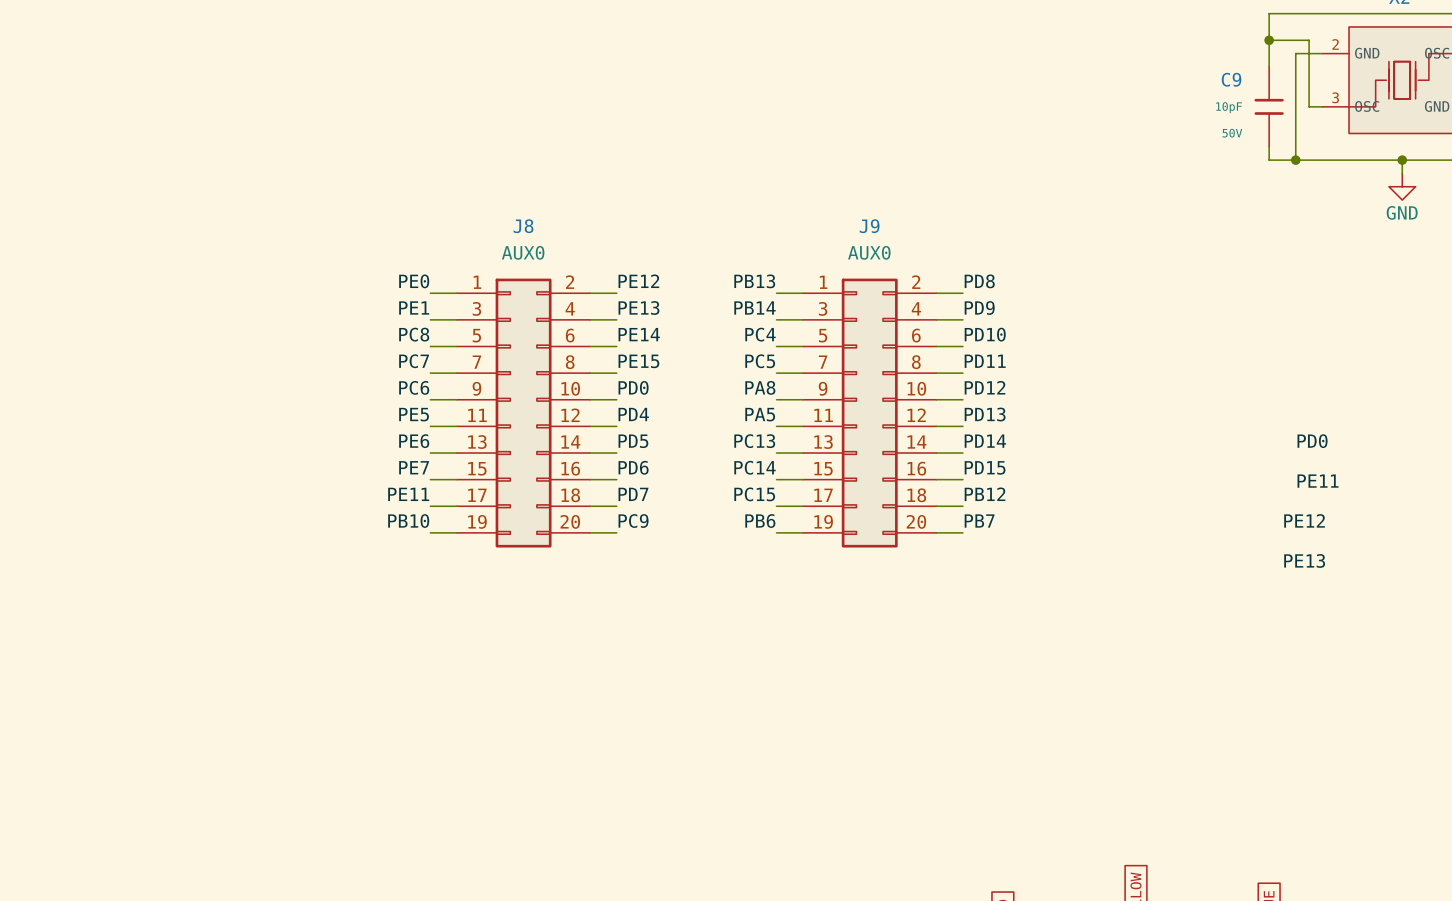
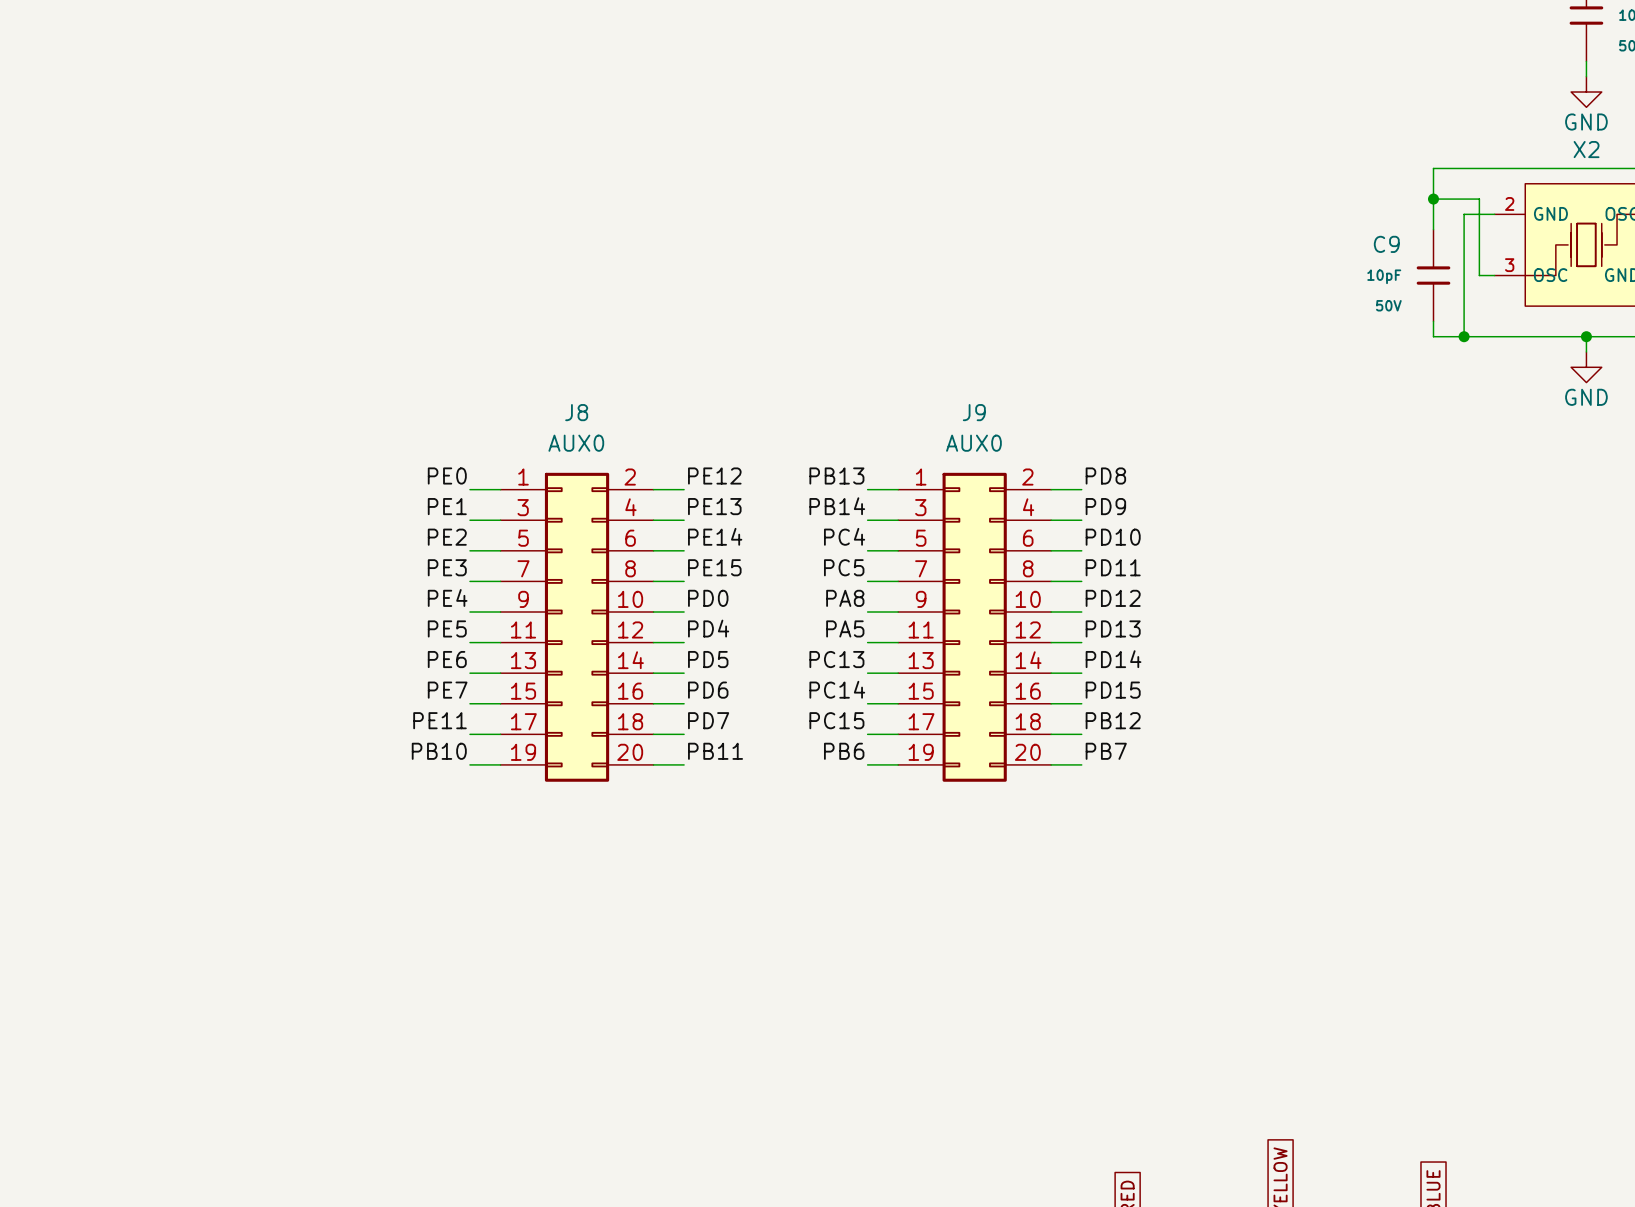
label: PC8 (414, 334) -> PE2 (447, 537)
label: PC7 (414, 361) -> PE3 (447, 567)
label: PC6 (414, 387) -> PE4 (447, 597)
label: PD0 (1312, 441) -> none
label: PE11 (1318, 481) -> none
label: PE12 (1304, 520) -> none
label: PC9 (633, 521) -> PB11 (715, 751)
label: PE13 (1304, 560) -> none

